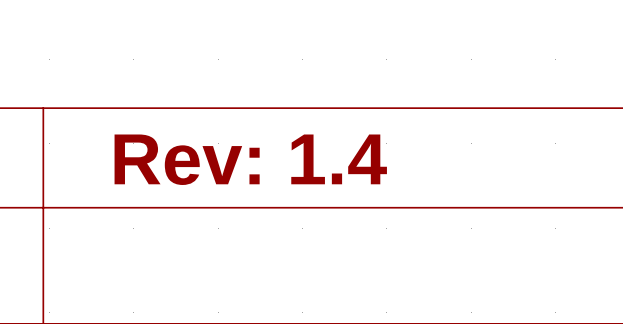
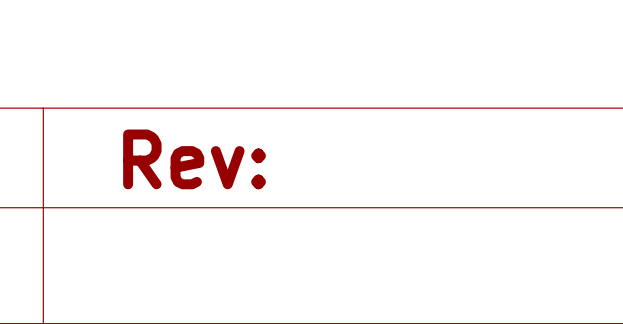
title block: Rev: 1.4 (250, 159) -> Rev: (194, 159)

